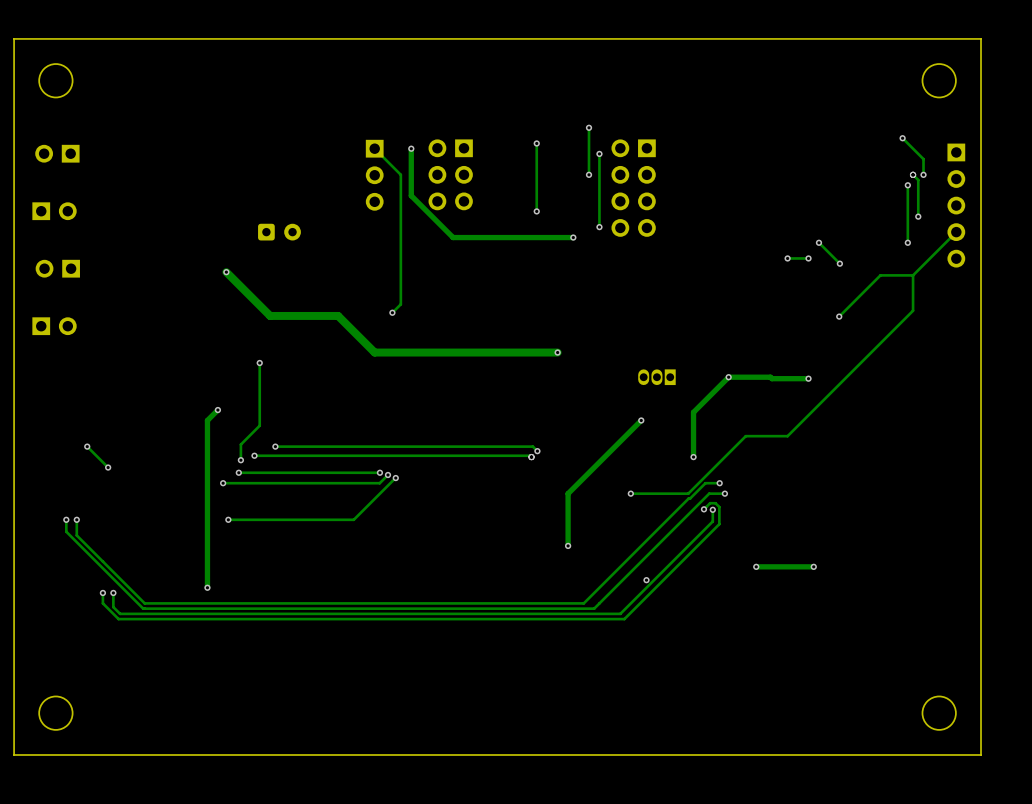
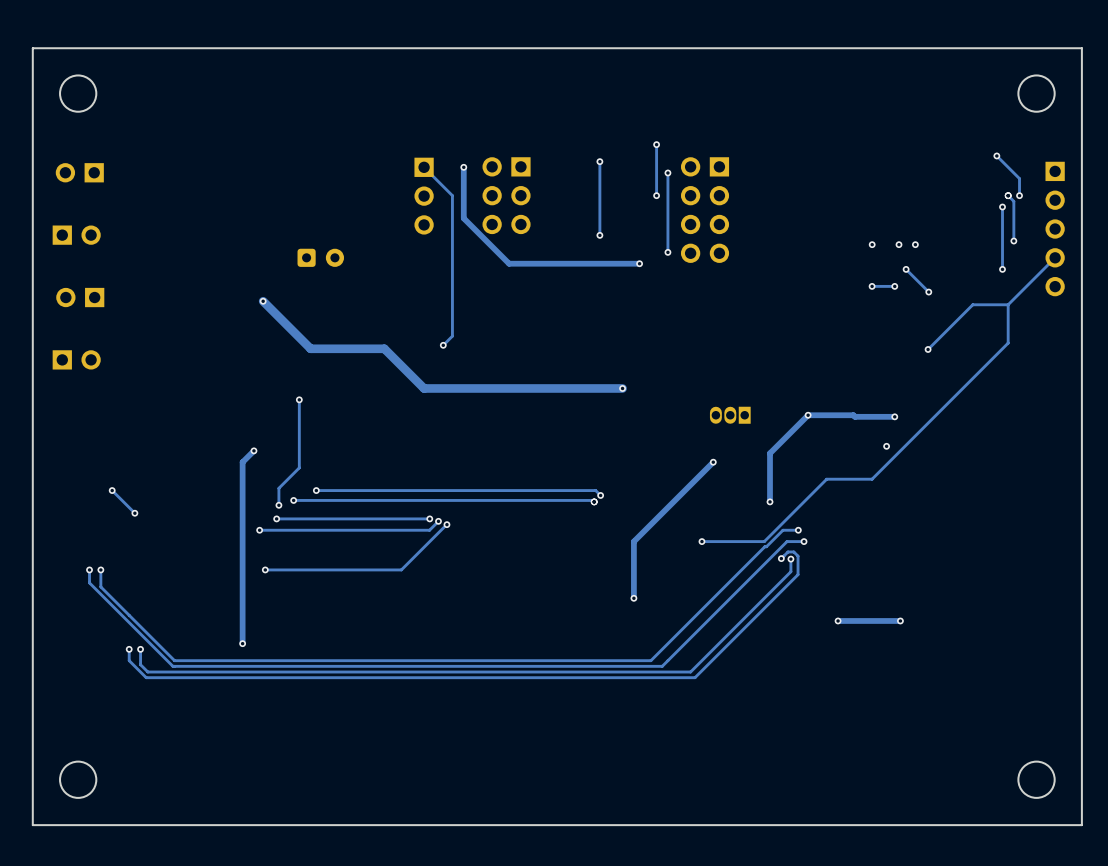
via: none -> (872, 244)
via: none -> (898, 244)
via: none -> (915, 244)
via: none -> (886, 446)
via: (646, 580) -> none

